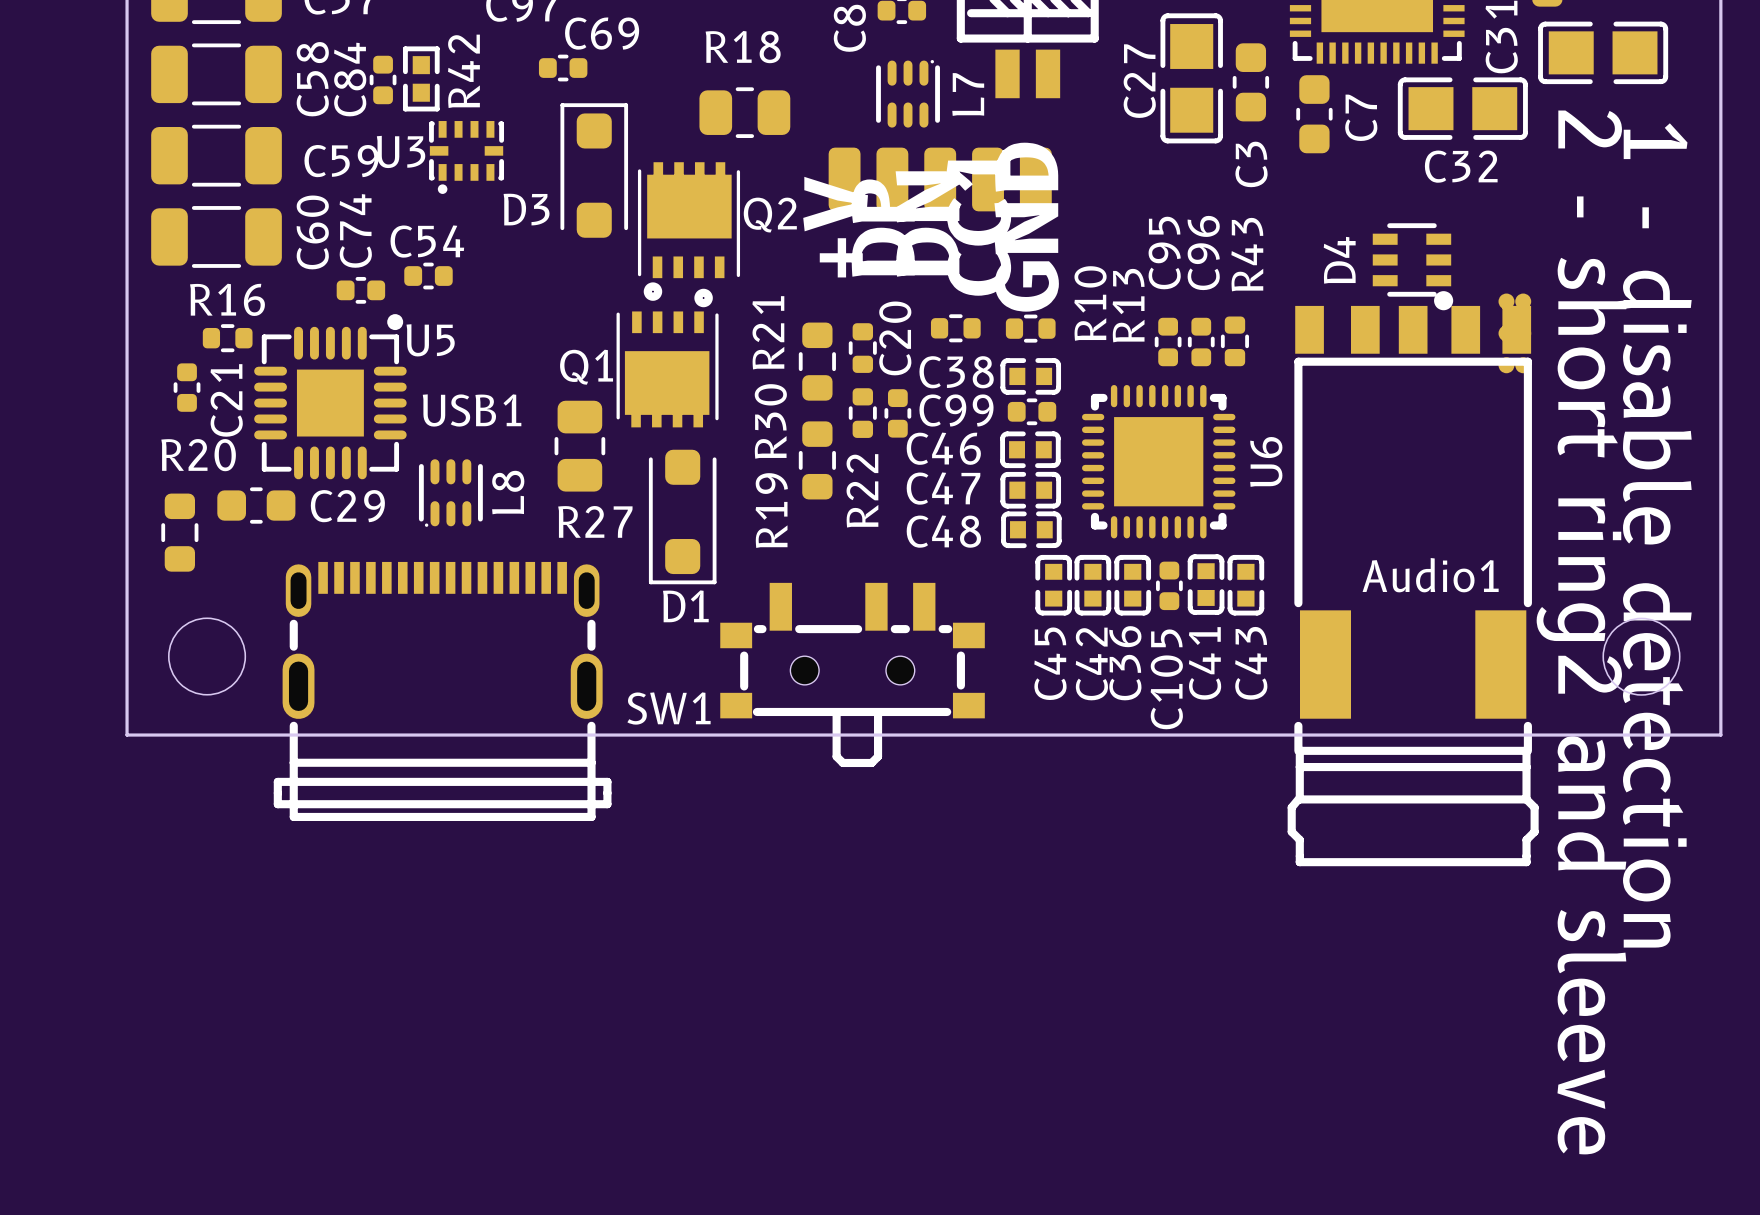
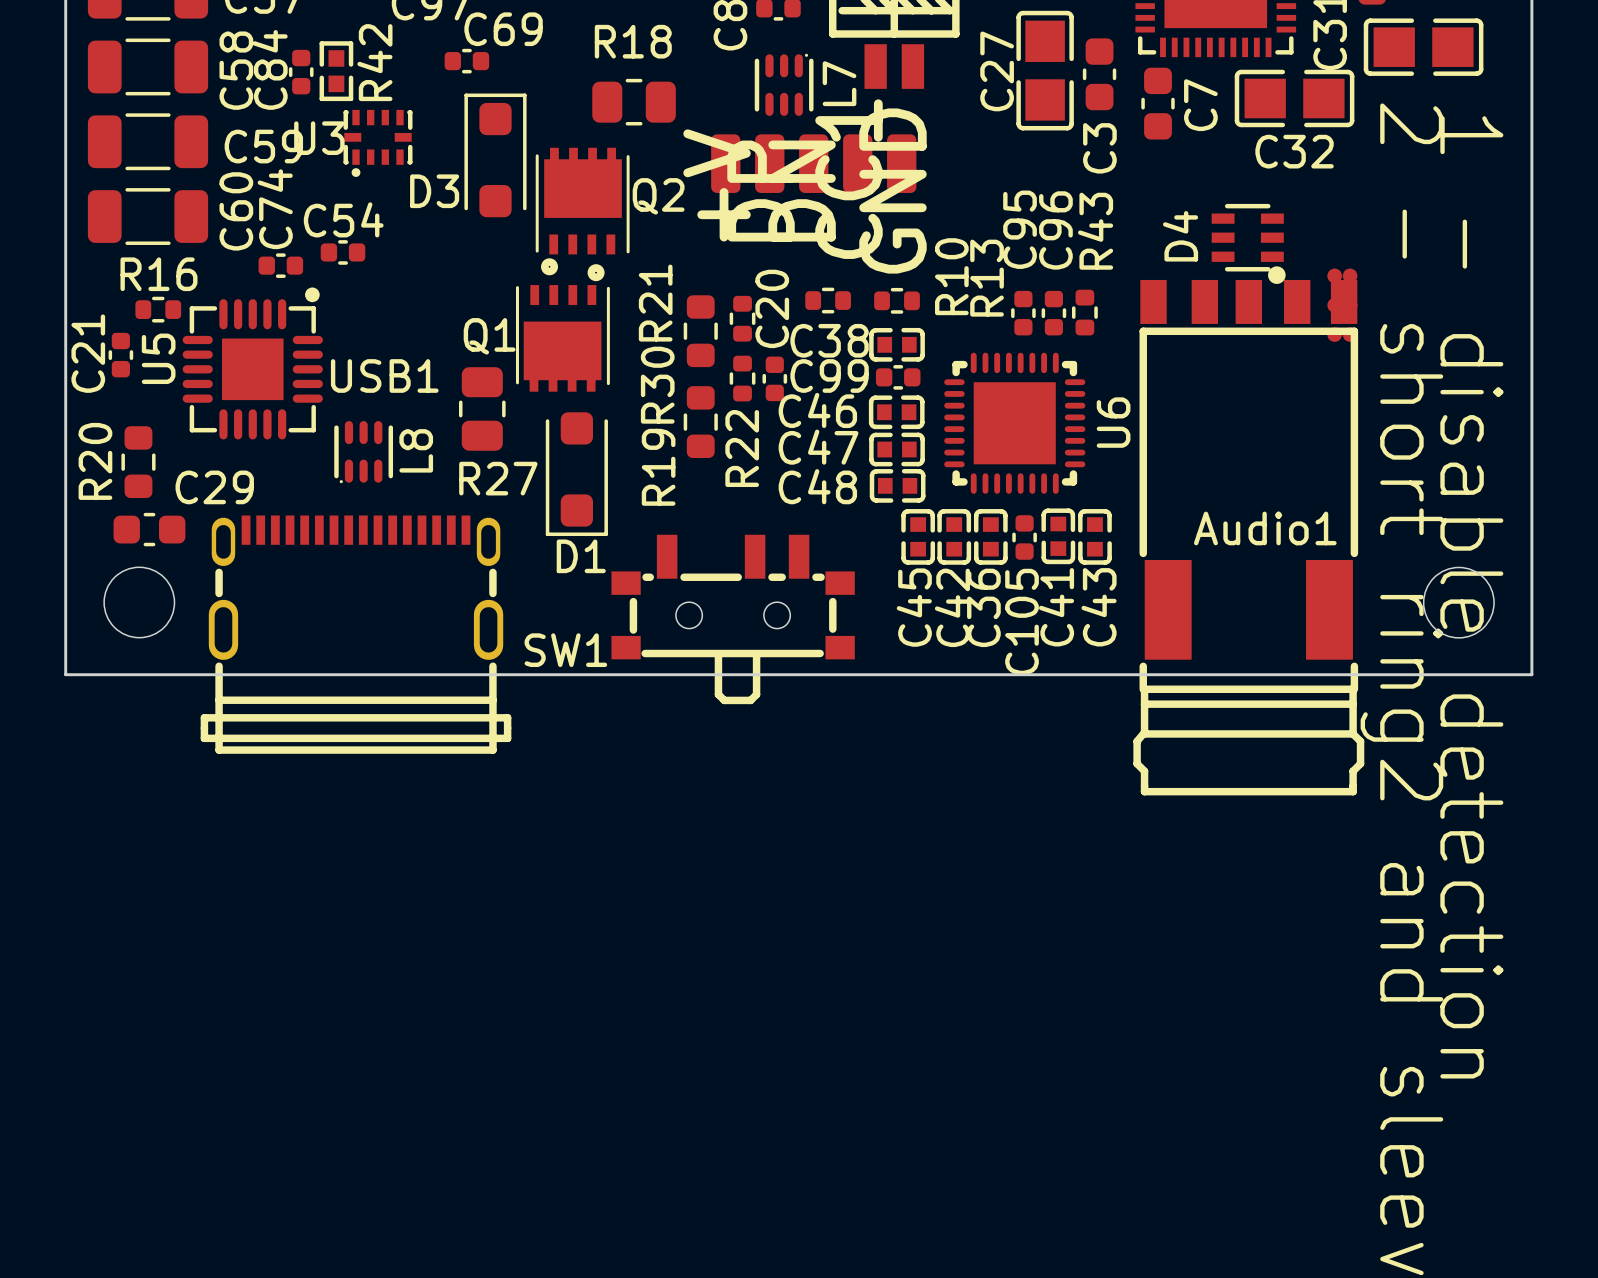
U5 name rotation: 0° (430, 340) -> 90° counterclockwise (158, 358)
U5 name position: U5 (430, 340) -> U5 (158, 358)
C21 name position: C21 (226, 400) -> C21 (88, 353)
R20 name rotation: 0° (198, 455) -> 90° counterclockwise (95, 461)
C29 position: (256, 505) -> (149, 529)
C29 name position: C29 (347, 506) -> C29 (214, 487)
R20 position: (179, 532) -> (138, 462)

